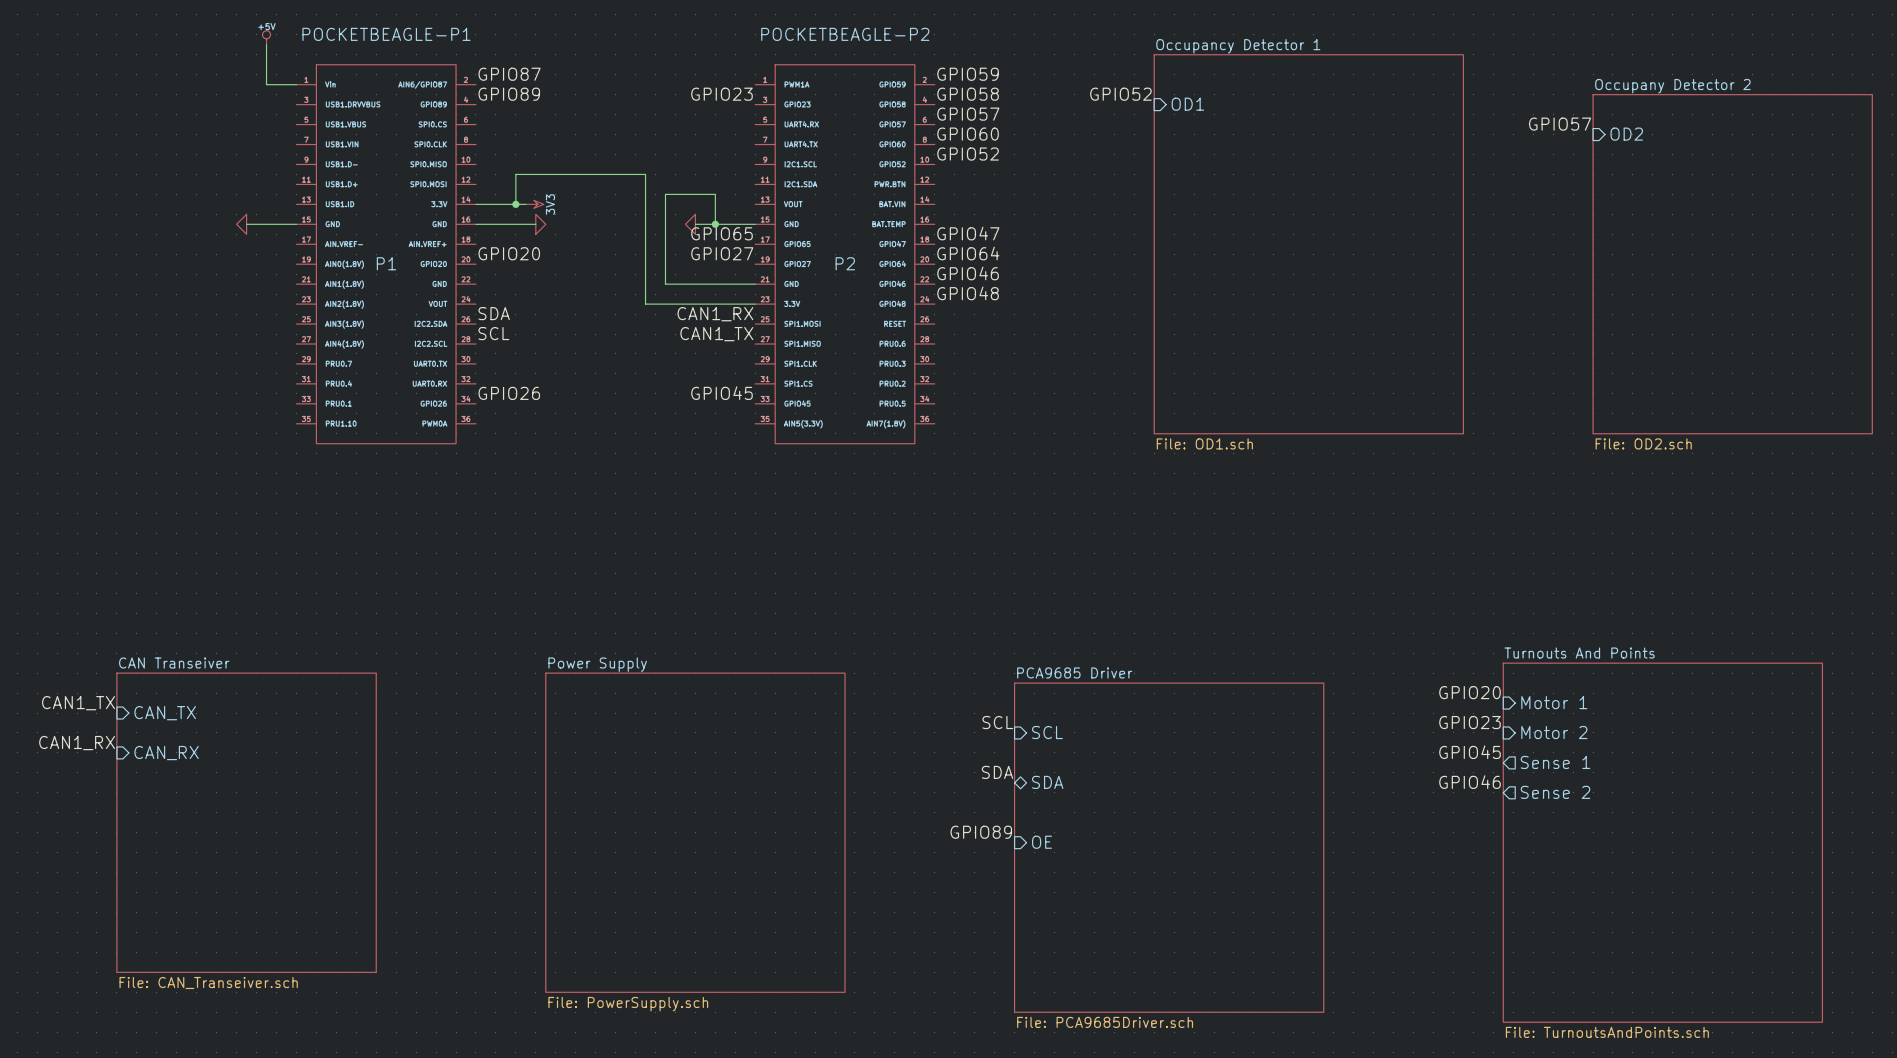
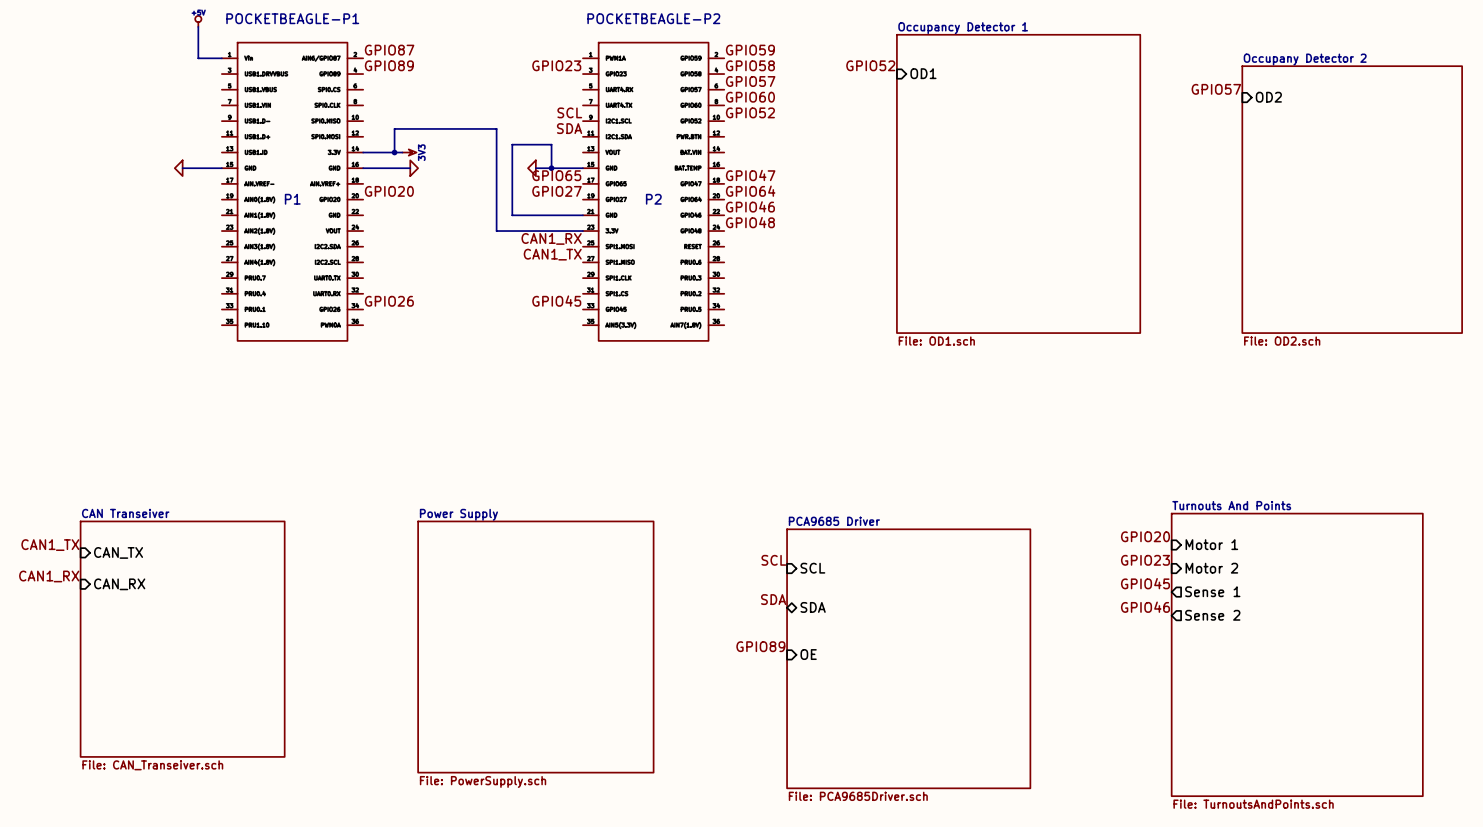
label: none -> SCL (569, 112)
label: none -> SDA (569, 128)
label: SDA (494, 313) -> none
label: SCL (493, 333) -> none

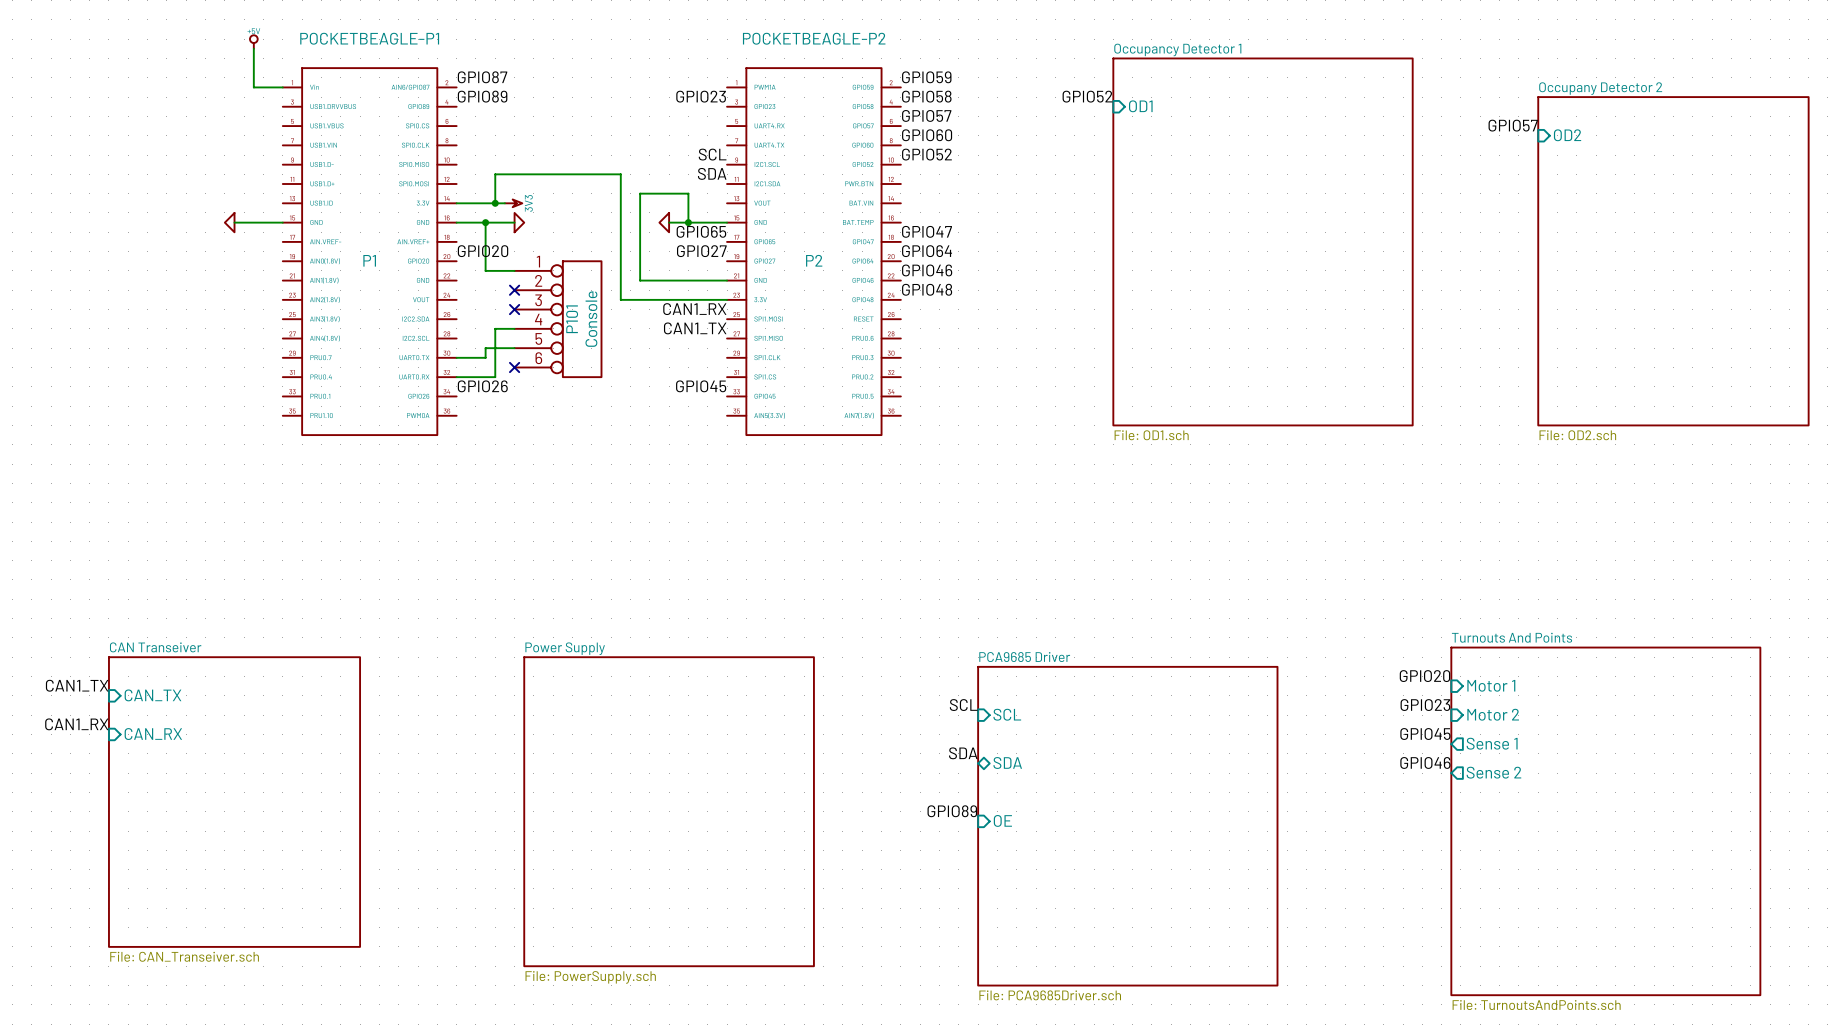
wire: none -> (485, 222) (485, 270) (514, 270)
junction: none -> (485, 222)
no-connect mark: none -> (514, 290)
no-connect mark: none -> (514, 309)
P101: none -> Console (558, 319)
wire: none -> (514, 328) (495, 328) (495, 377) (456, 377)
wire: none -> (514, 348) (485, 348) (485, 357) (456, 357)
no-connect mark: none -> (514, 367)

